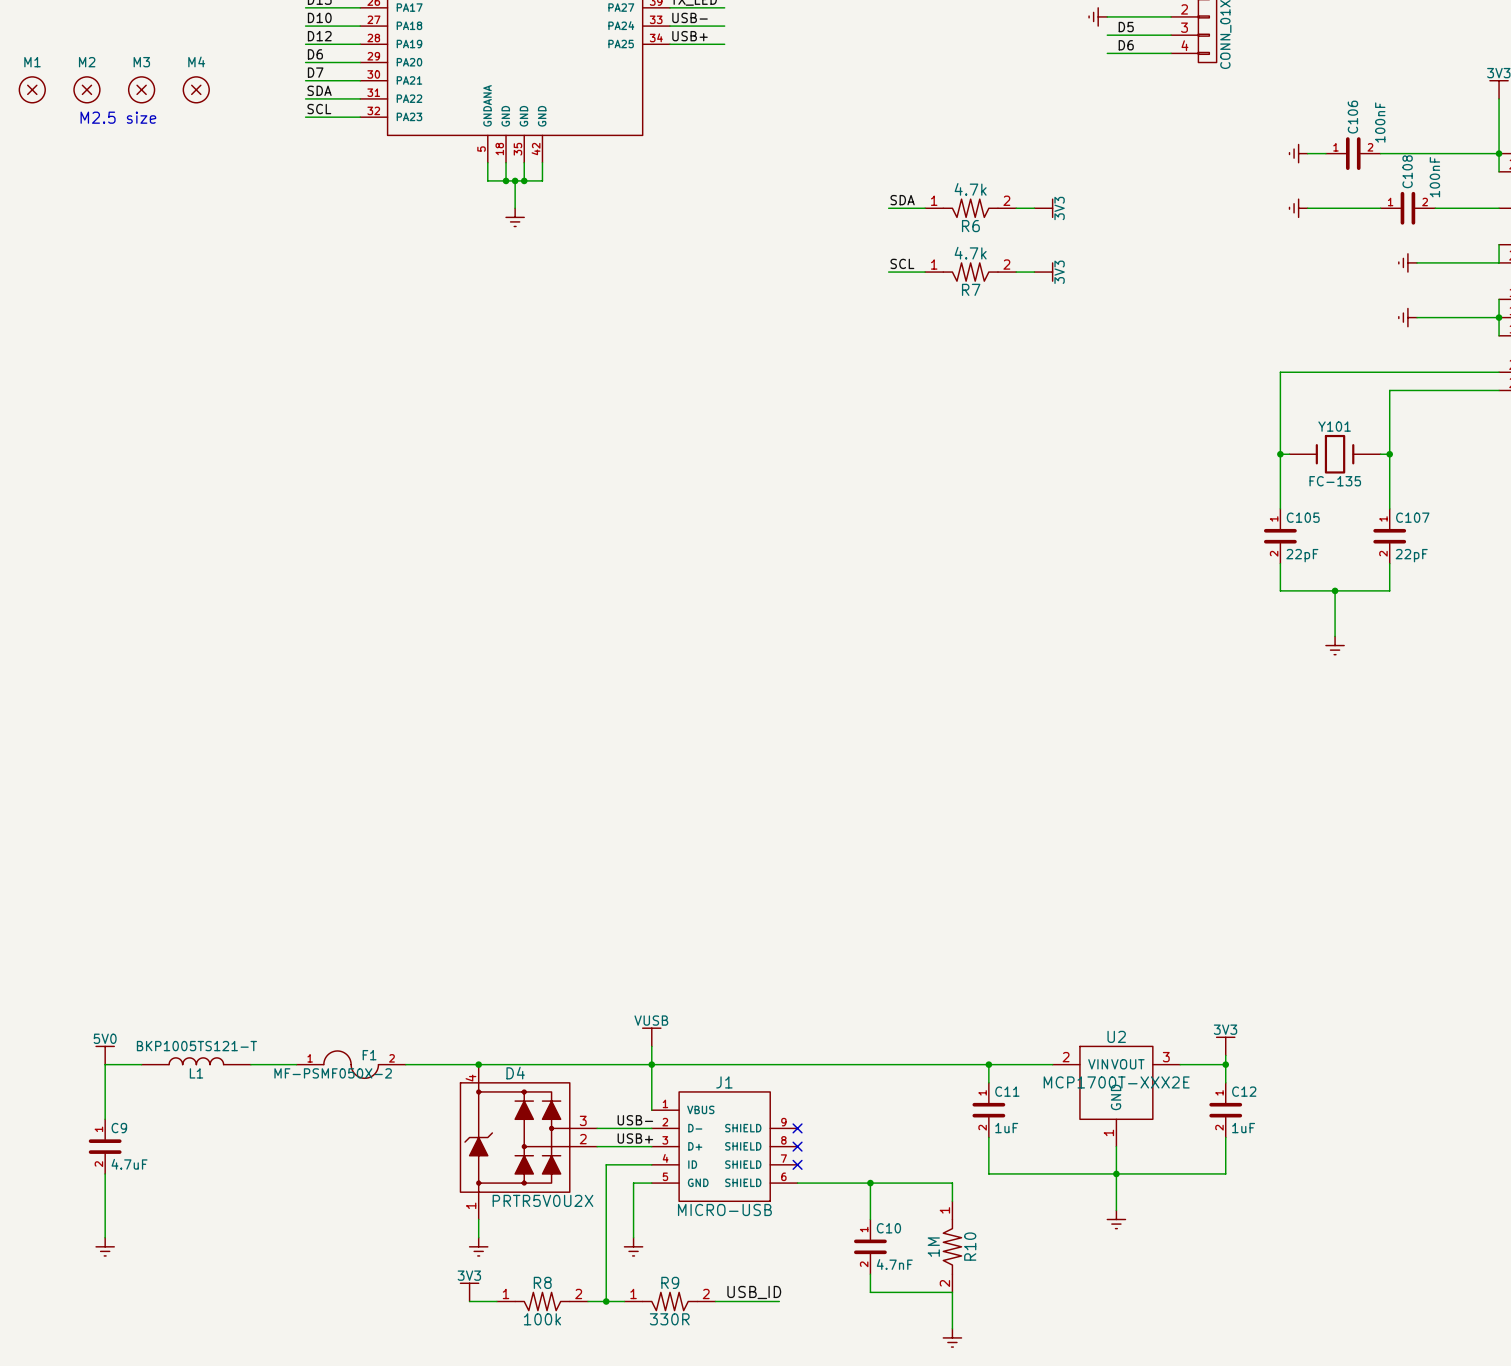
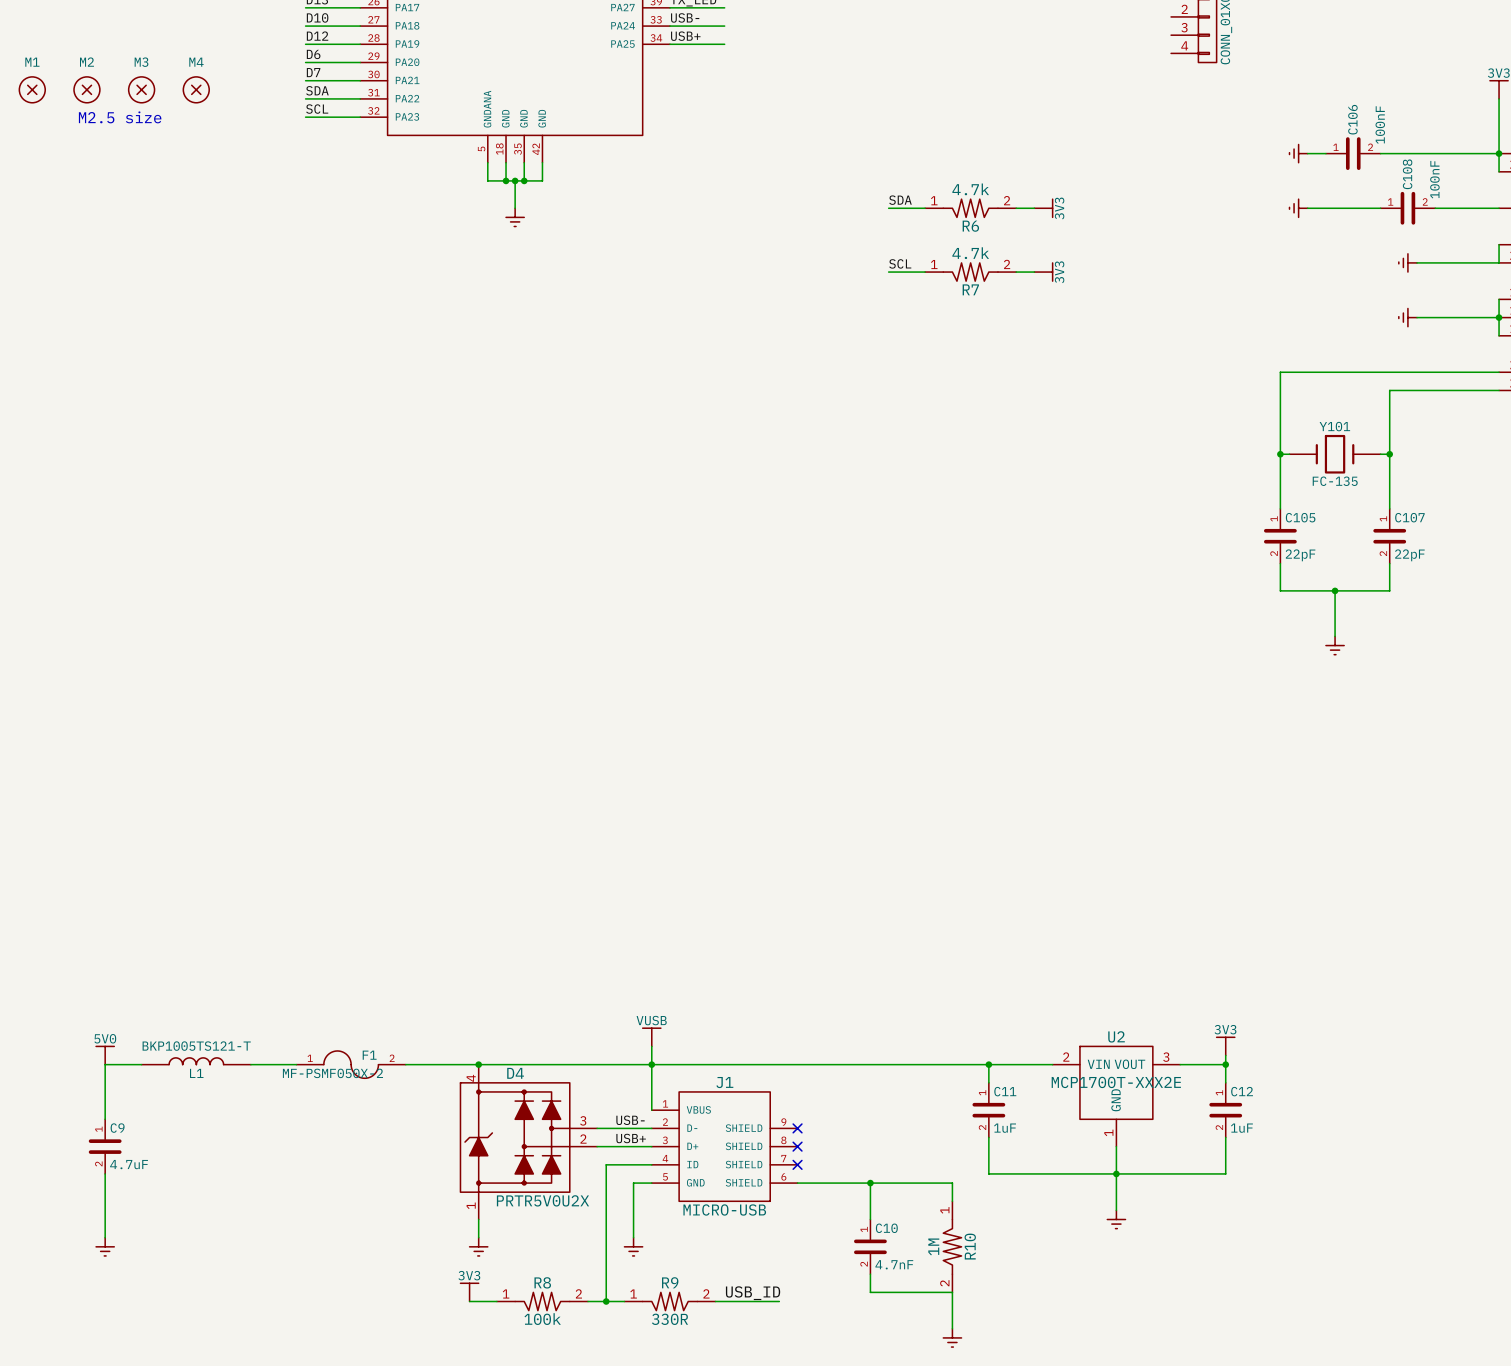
power symbol: (1098, 16) -> none
wire: (1107, 16) (1171, 16) -> none
label: D5 (1126, 27) -> none
wire: (1107, 35) (1171, 35) -> none
label: D6 (1126, 45) -> none
wire: (1107, 53) (1171, 53) -> none

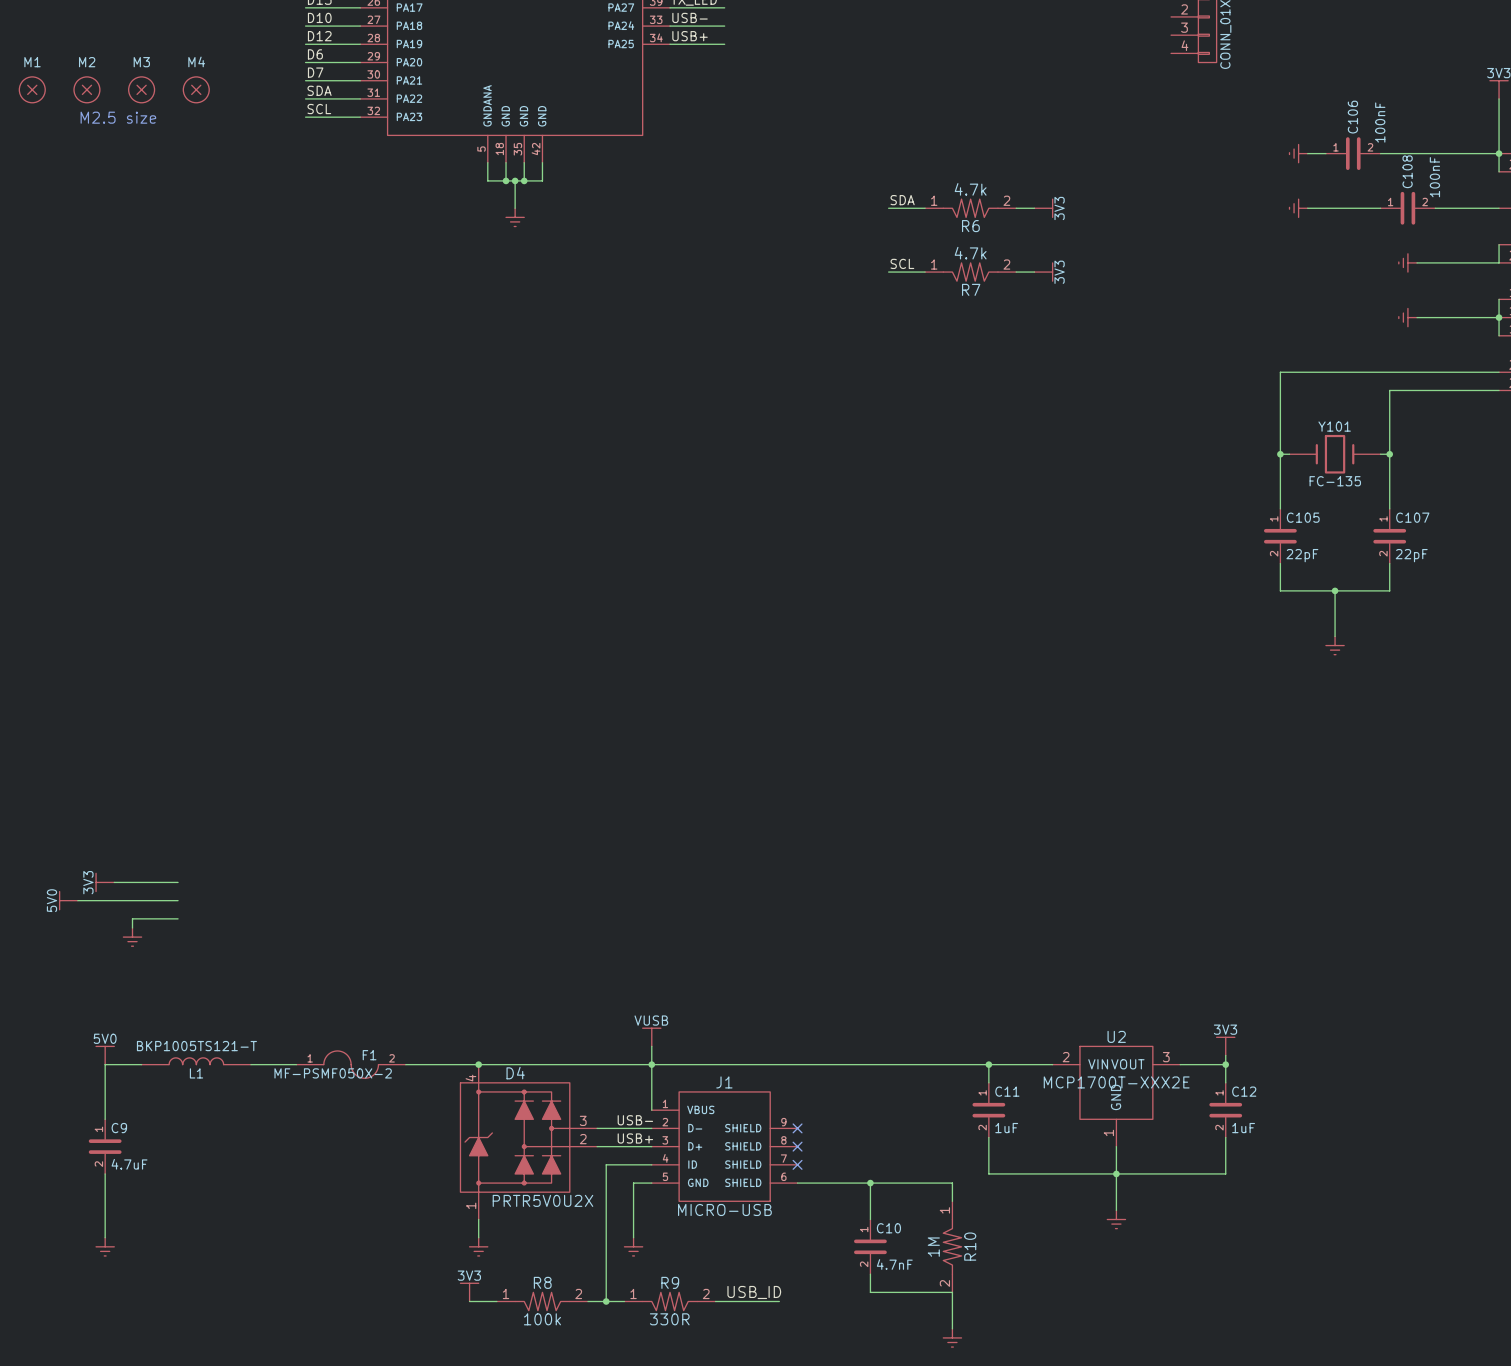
power symbol: none -> 3V3 (105, 882)
wire: none -> (114, 882) (178, 882)
power symbol: none -> 5V0 (68, 900)
wire: none -> (77, 900) (178, 900)
wire: none -> (178, 918) (132, 918) (132, 927)
power symbol: none -> (132, 937)

